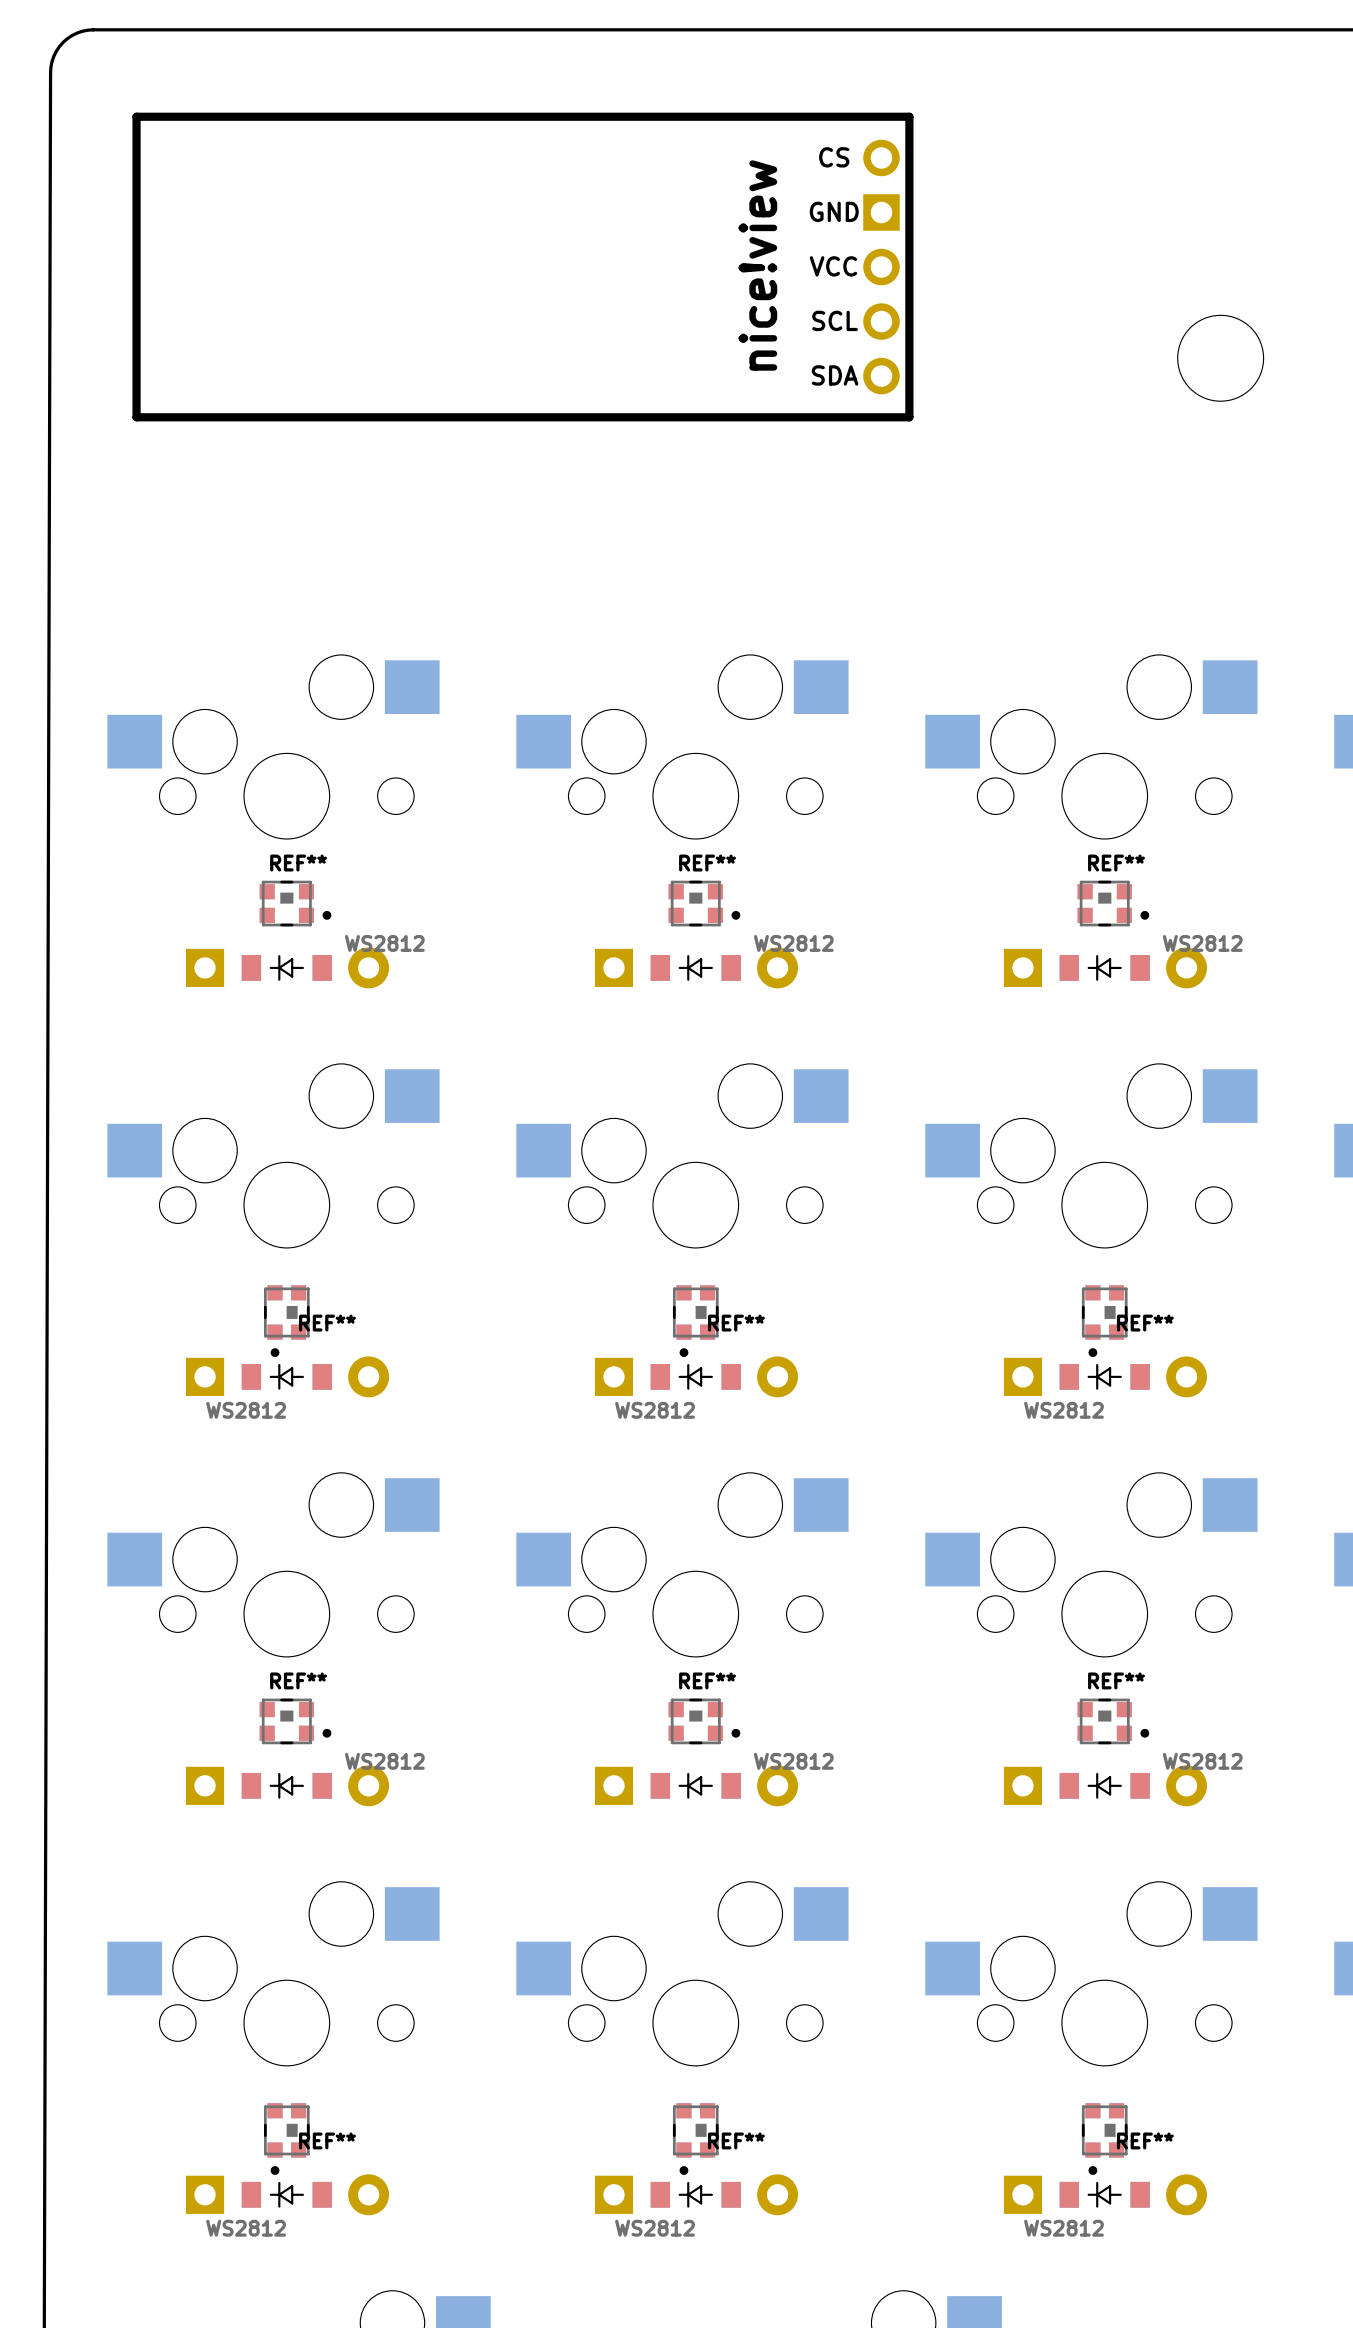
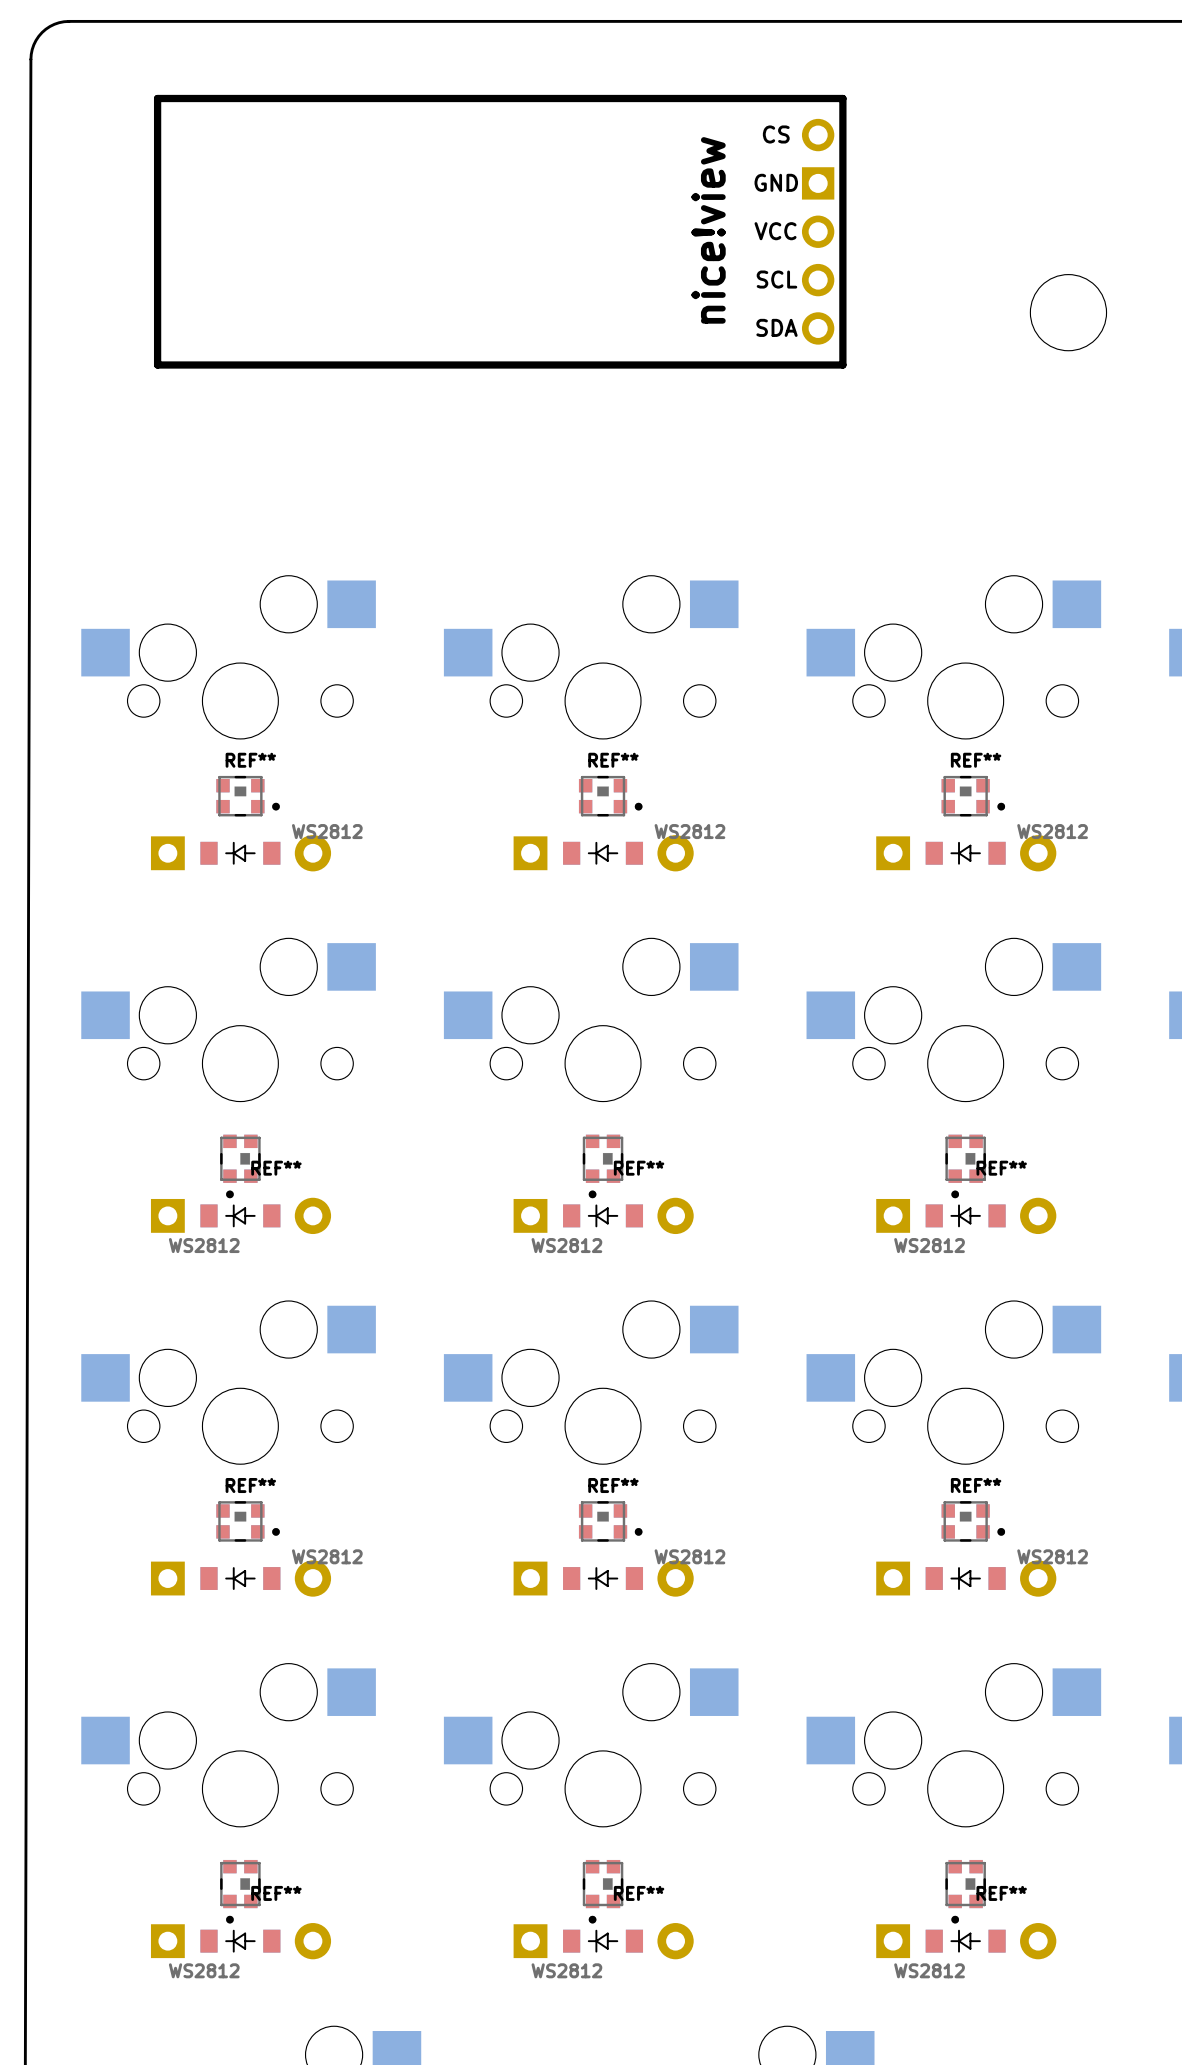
part position: (522, 267) -> (500, 231)

